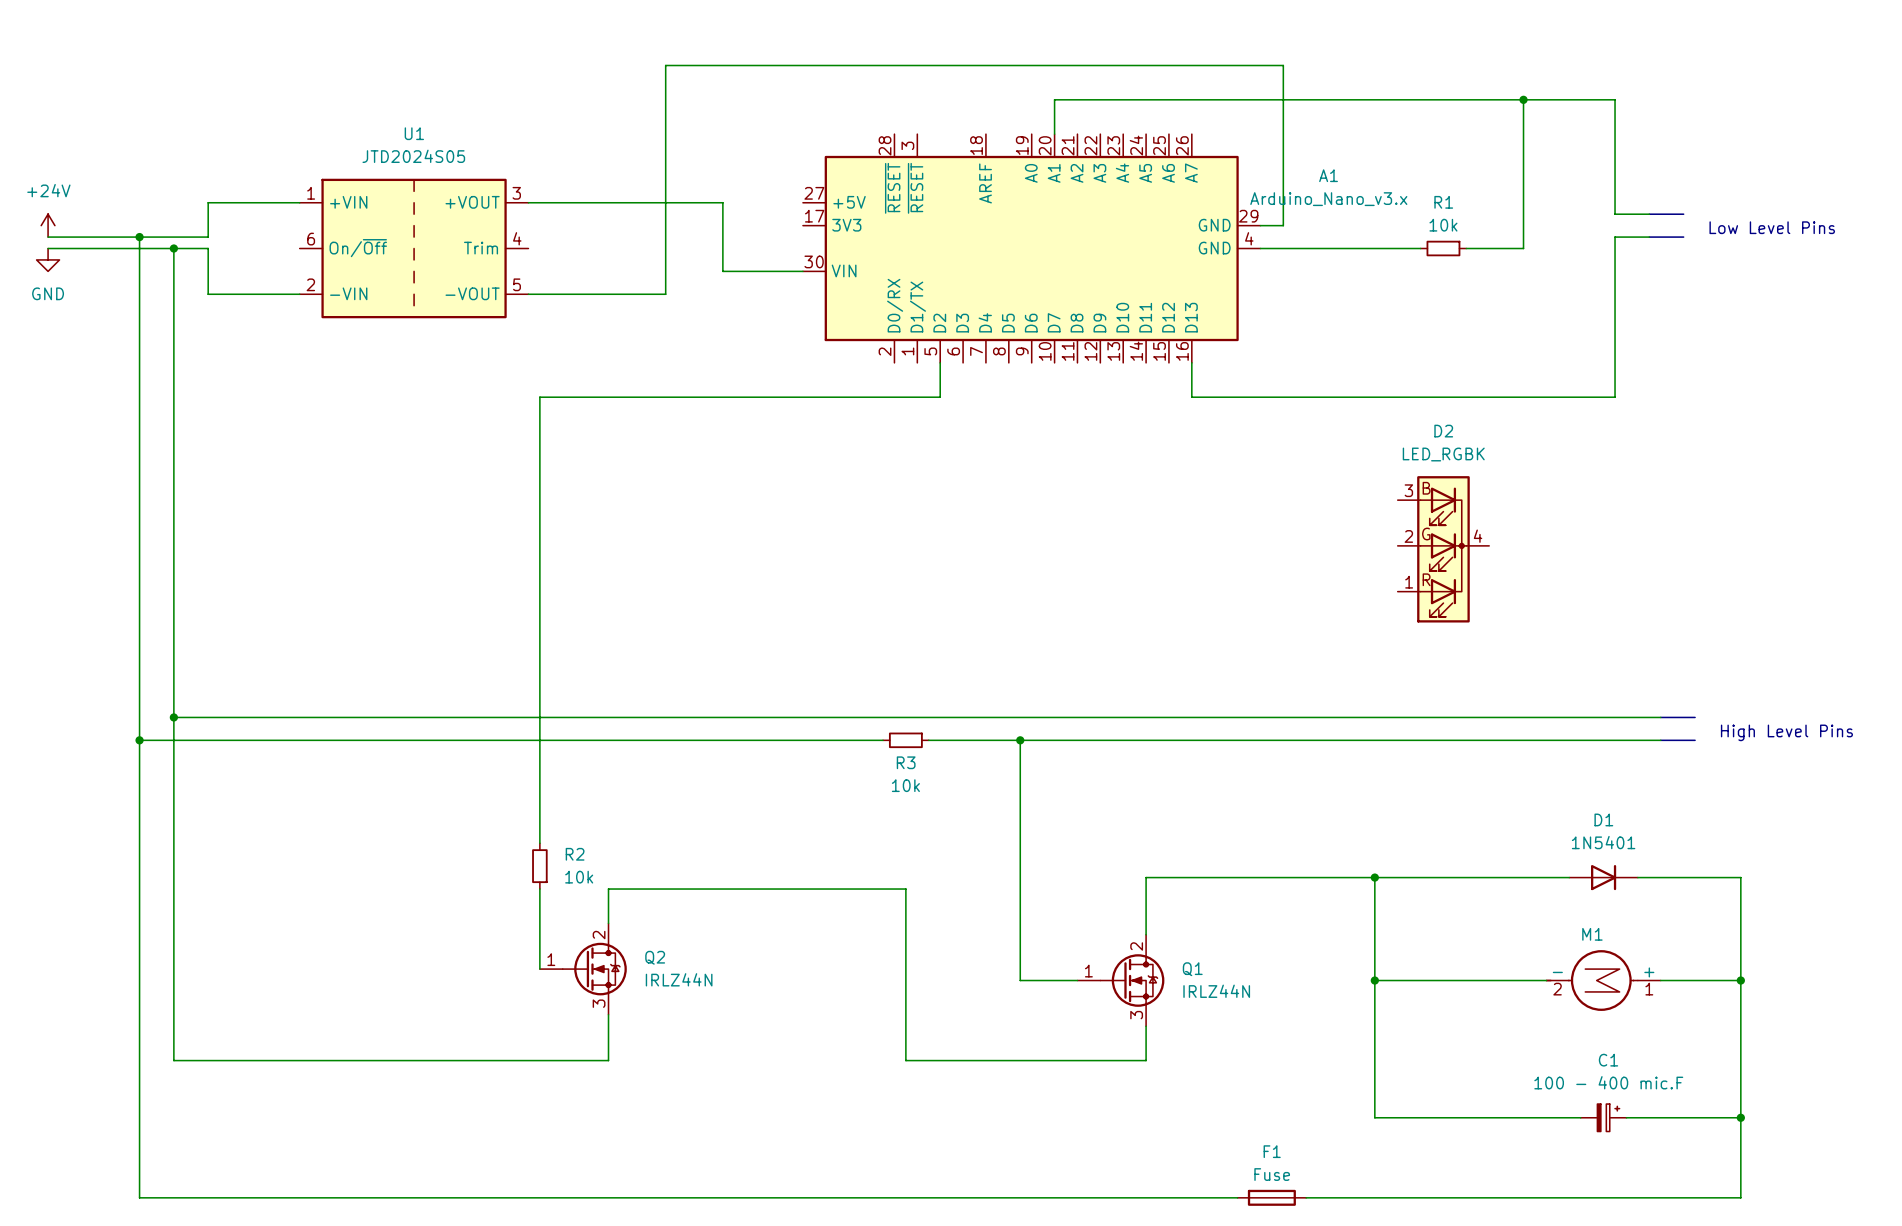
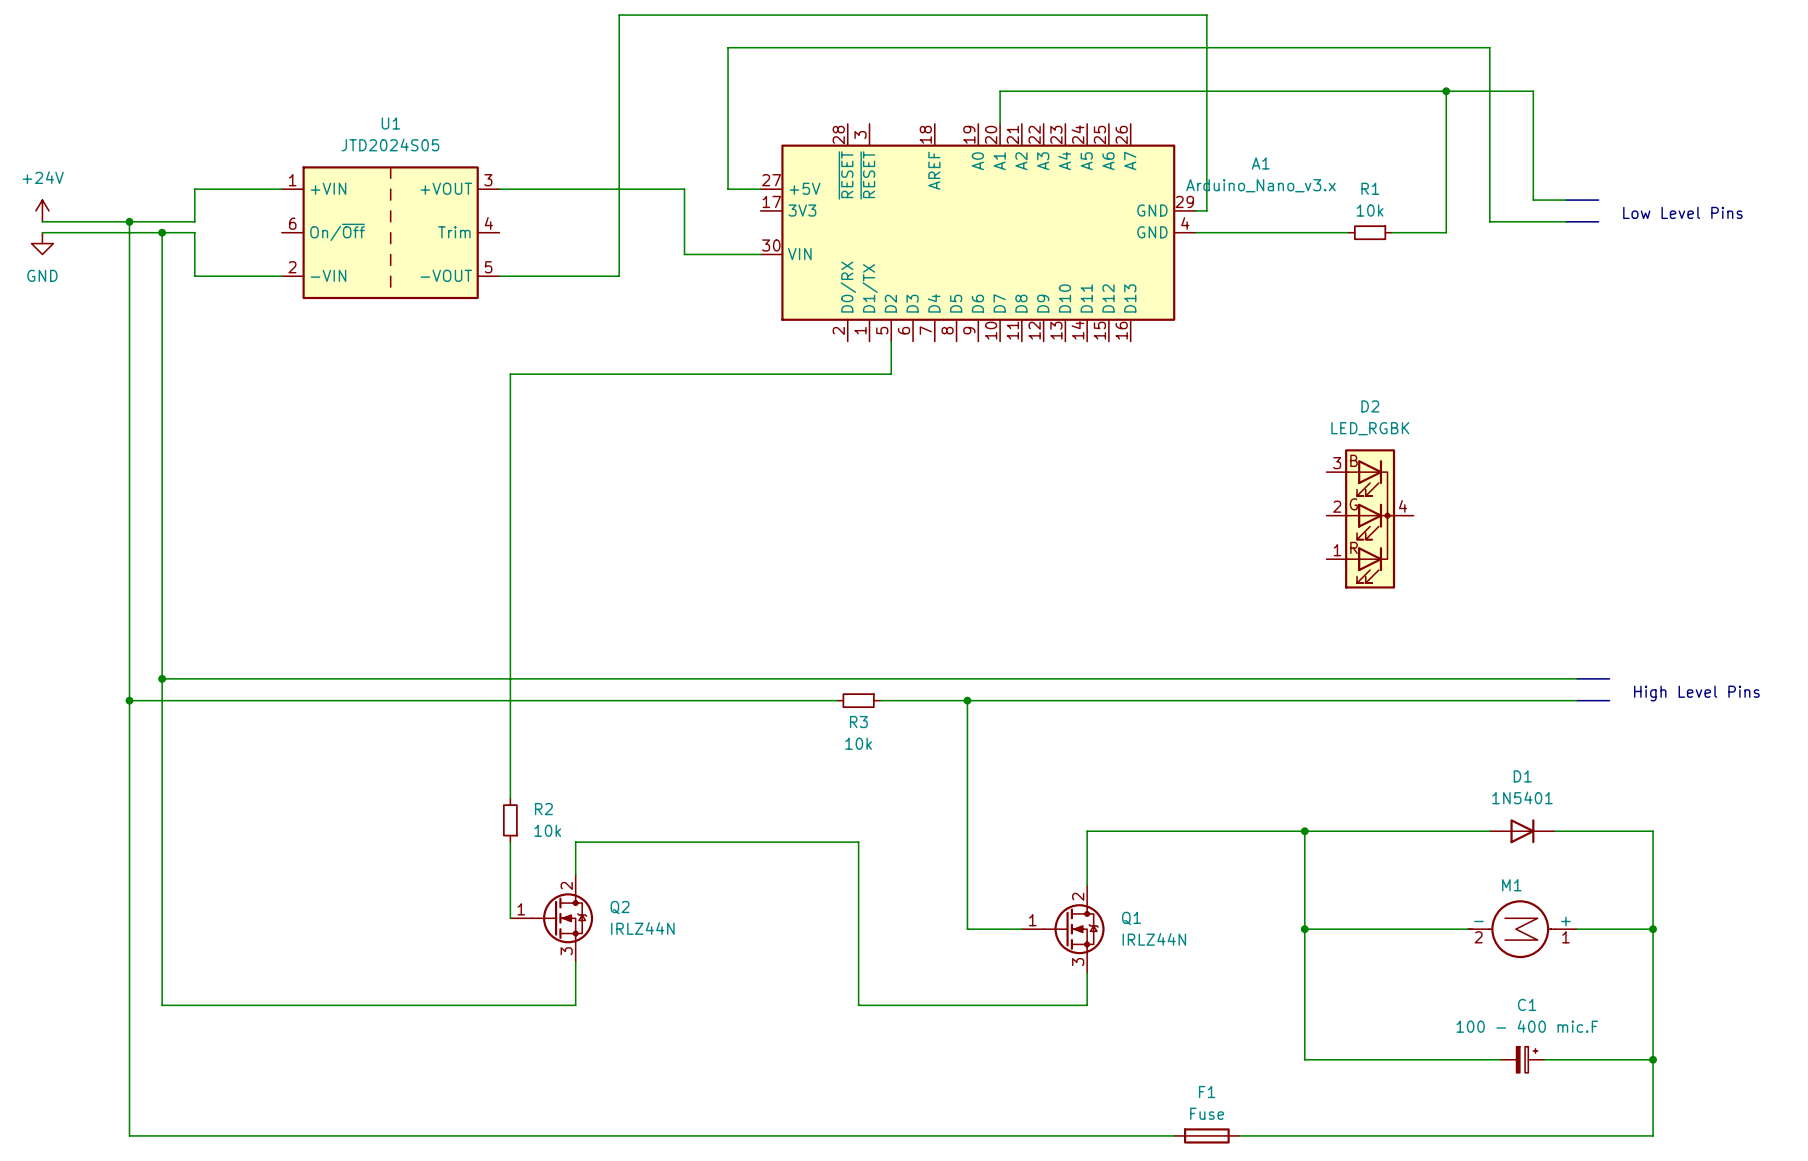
wire: (1271, 225) (1283, 225) (1283, 65) (665, 65) (665, 294) (654, 294) -> (1206, 210) (1206, 15) (619, 15) (619, 276)
wire: (1615, 237) (1615, 397) (1191, 397) (1191, 362) -> (1533, 221) (1489, 221) (1489, 47) (728, 47) (728, 189) (760, 189)

